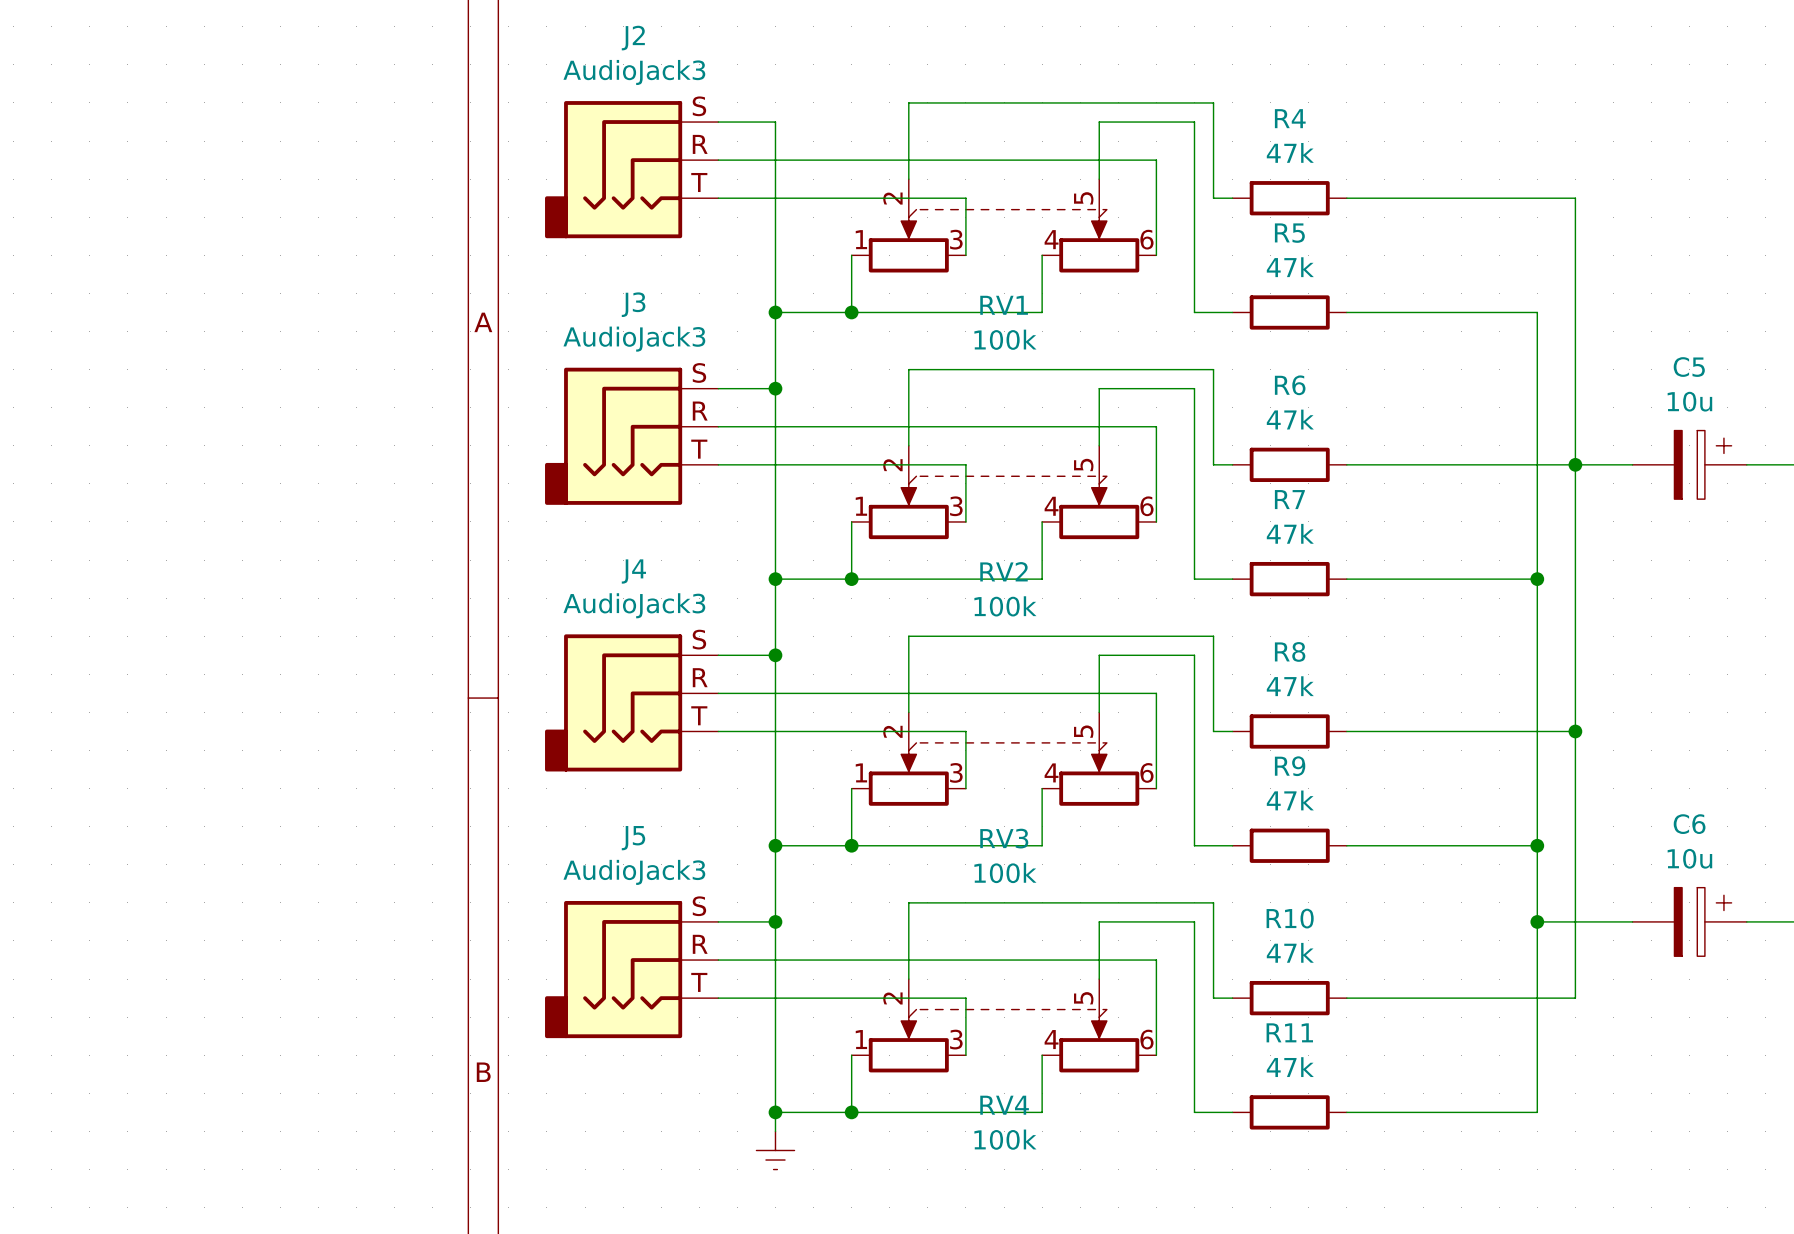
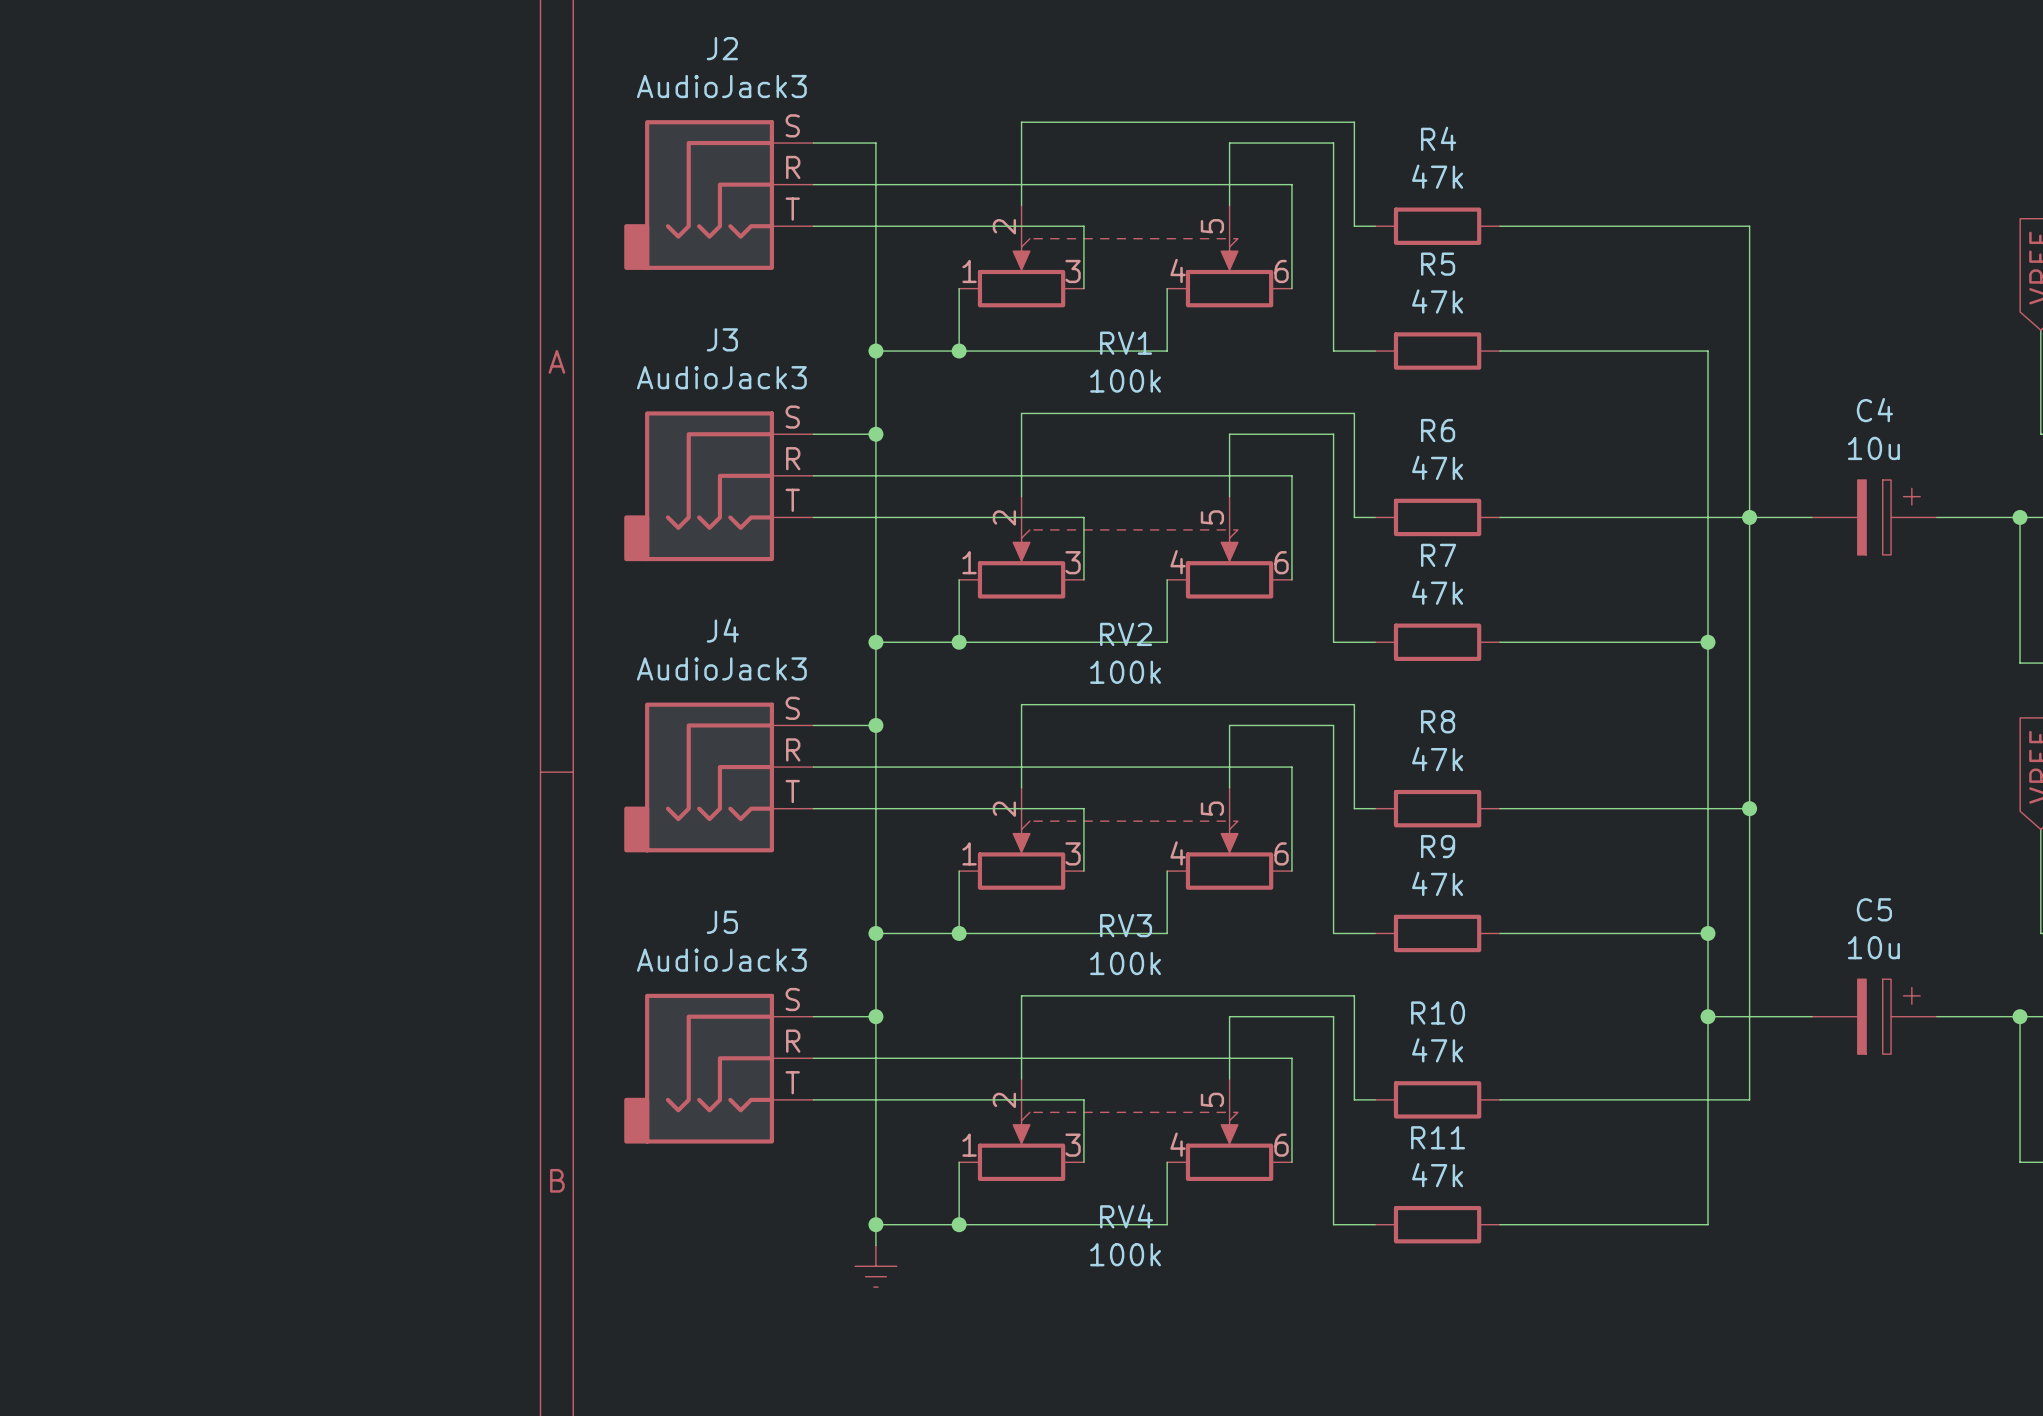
C5 name: C5 (1689, 367) -> C4 (1874, 410)
C6 name: C6 (1689, 824) -> C5 (1874, 909)

